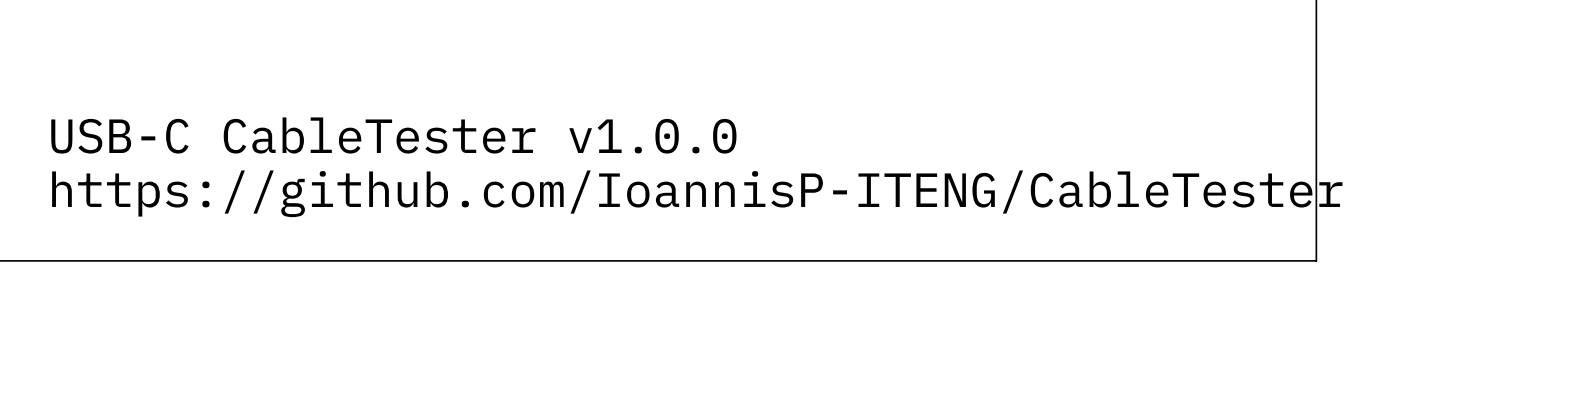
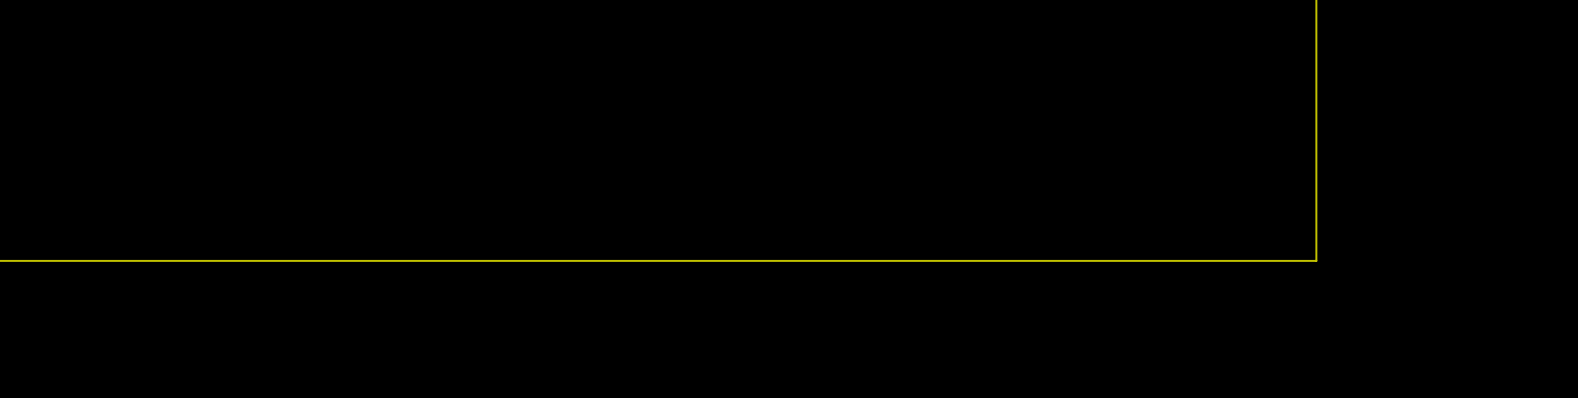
text: USB-C CableTester v1.0.0 (393, 135) -> none
text: https://github.com/IoannisP-ITENG/CableTester (697, 193) -> none

